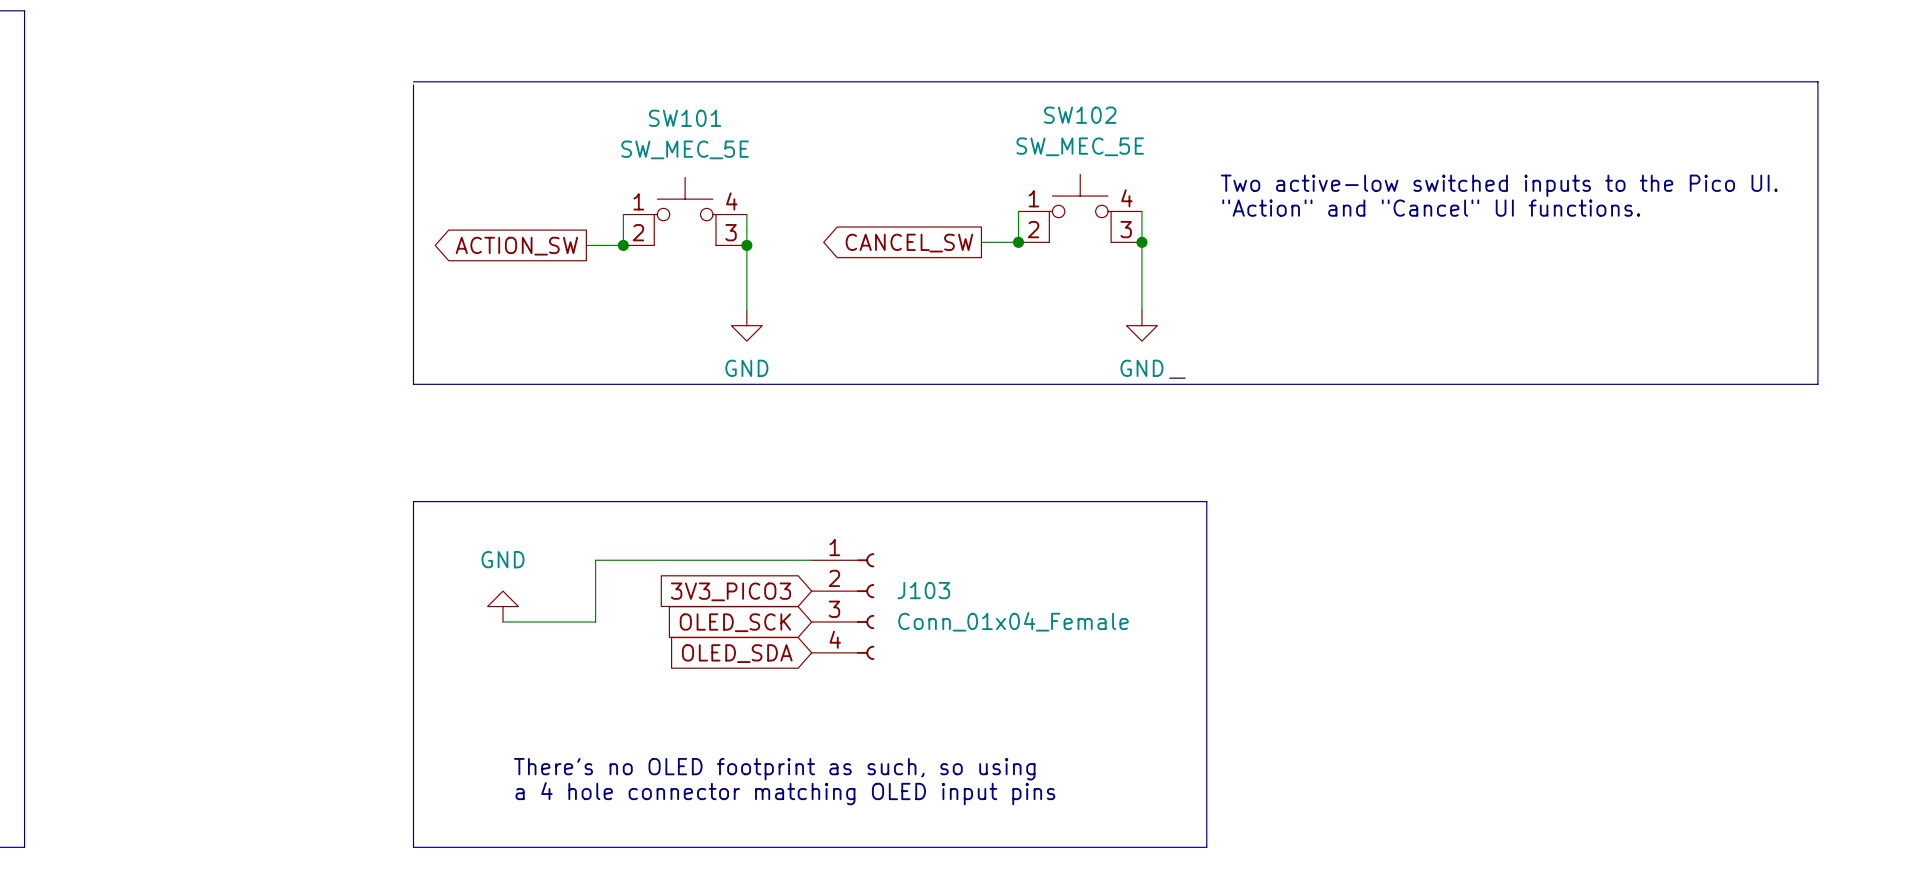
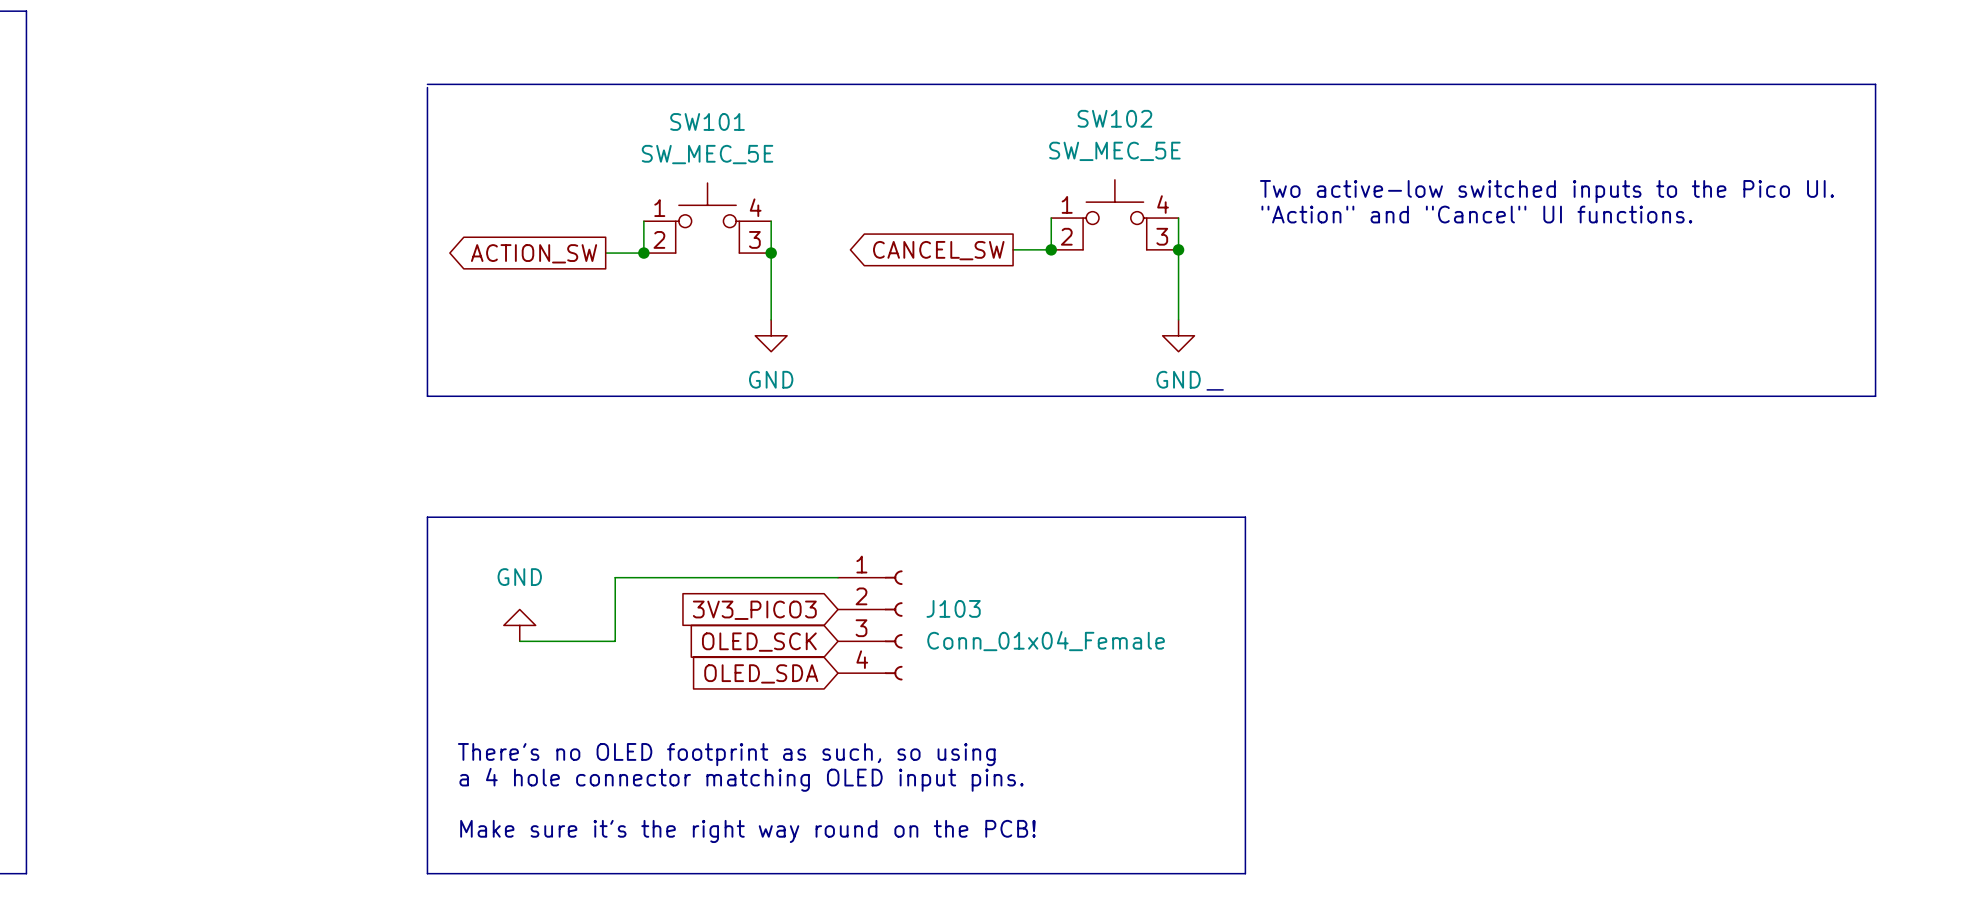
text: none -> a 4 hole connector matching OLED input pins. (741, 779)
text position: There's no OLED footprint as such, so using (774, 769) -> There's no OLED footprint as such, so using (726, 754)
text: a 4 hole connector matching OLED input pins (785, 793) -> none
text: none -> Make sure it's the right way round on the PCB! (747, 831)

